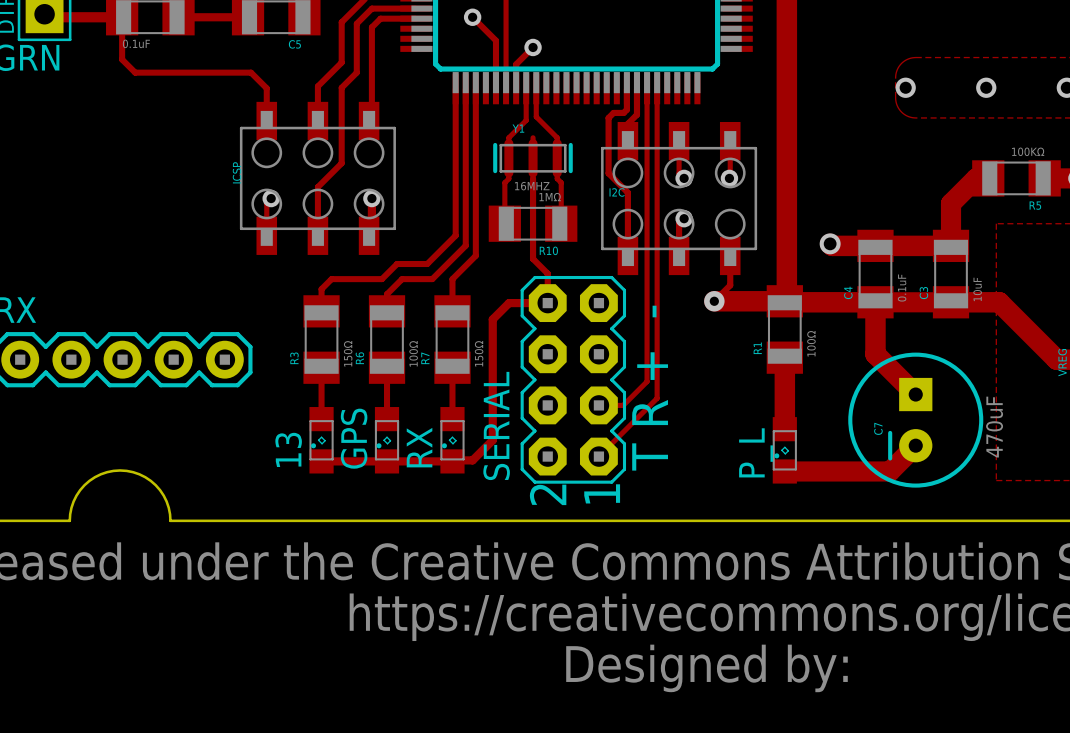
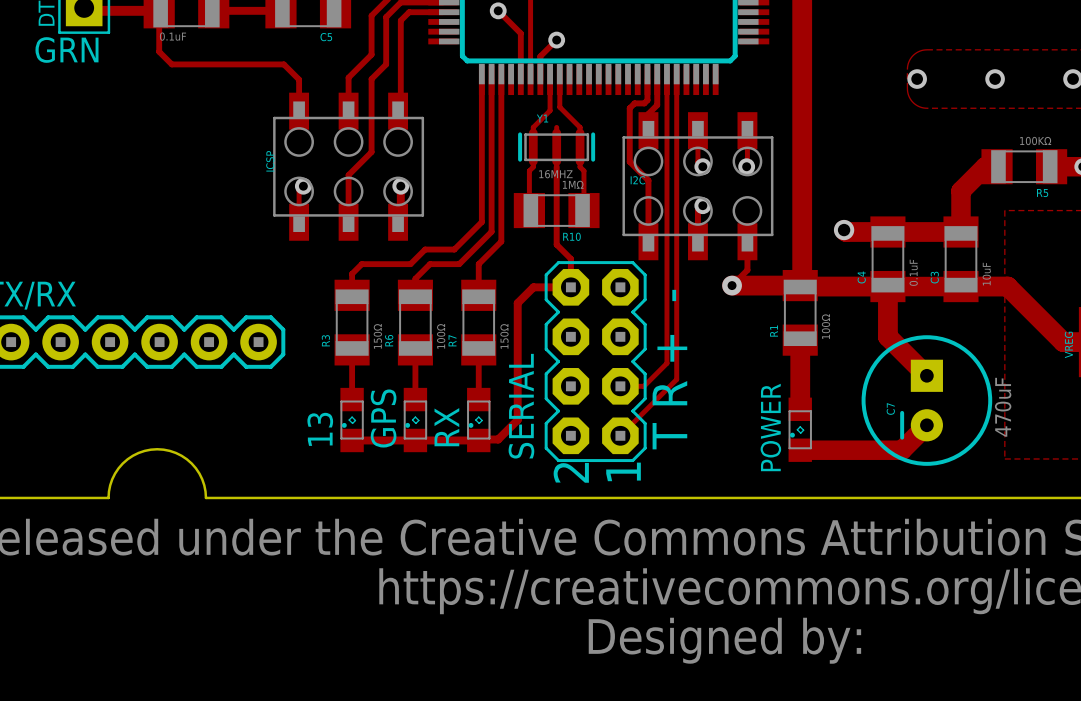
P_L name: P_L (756, 452) -> POWER (770, 427)

